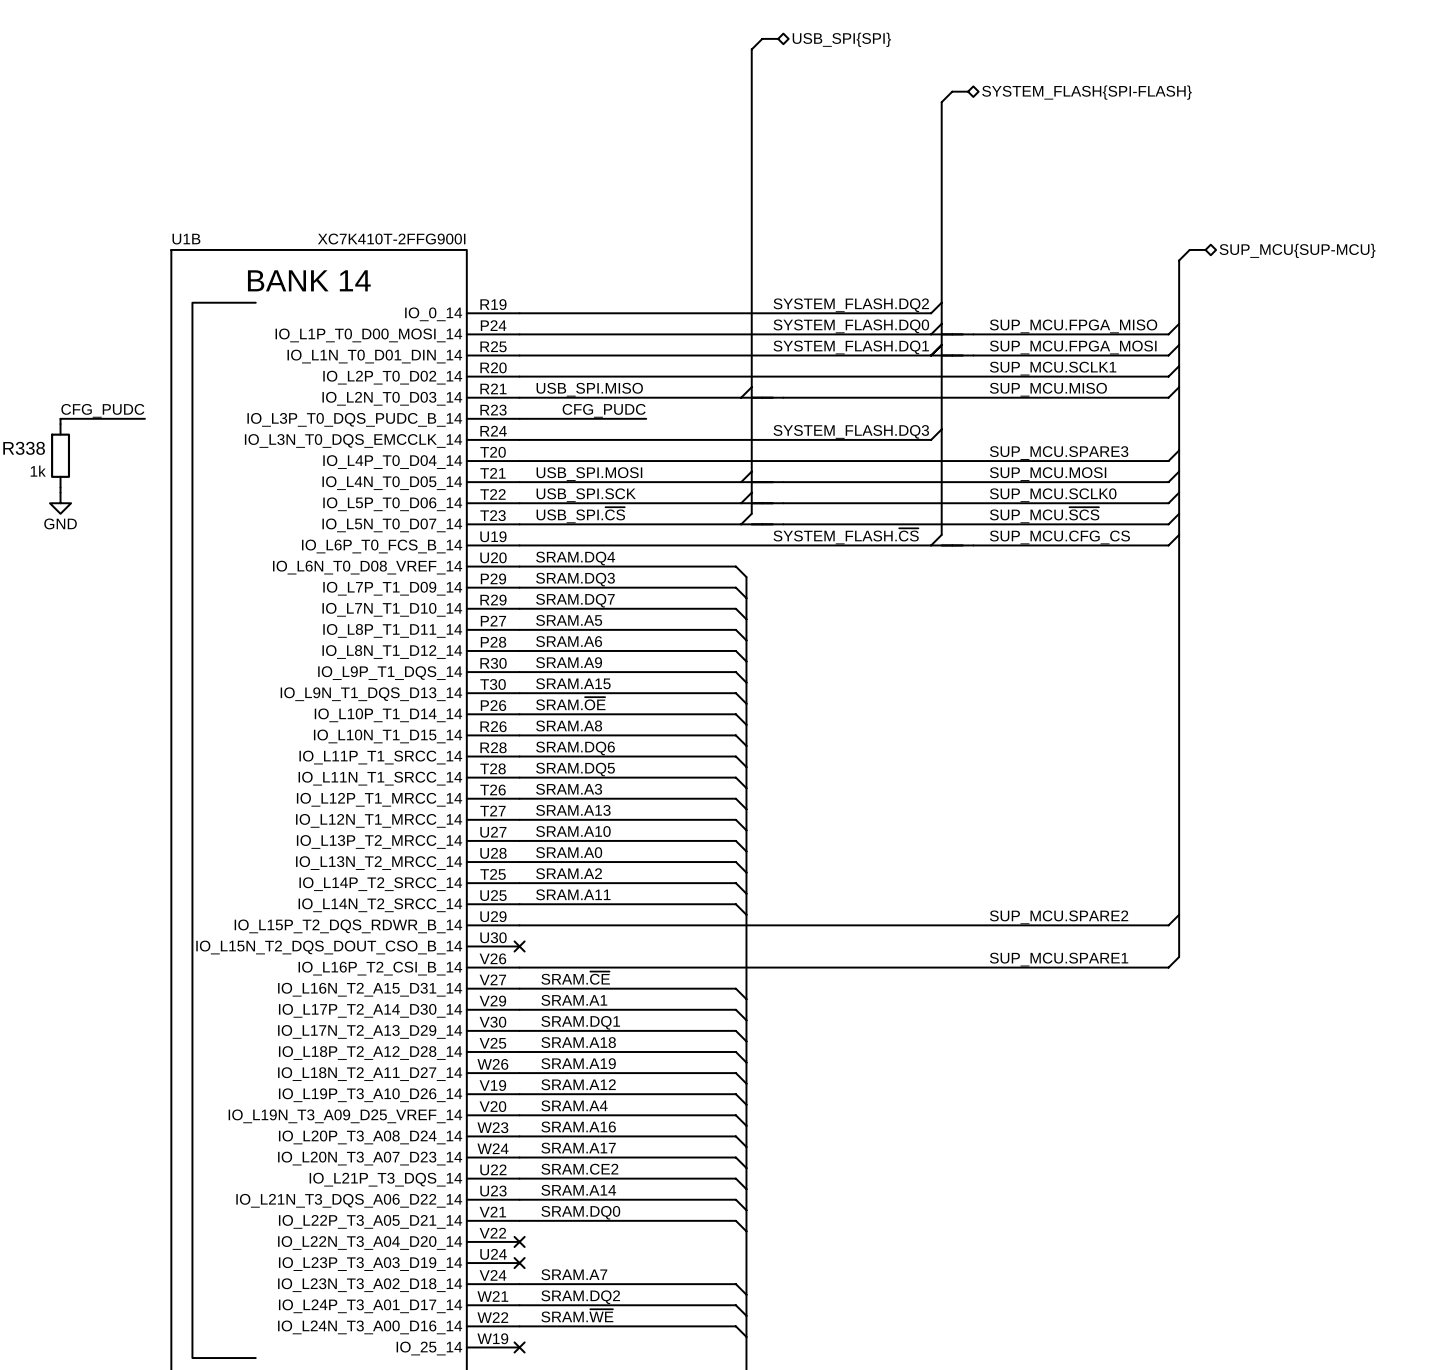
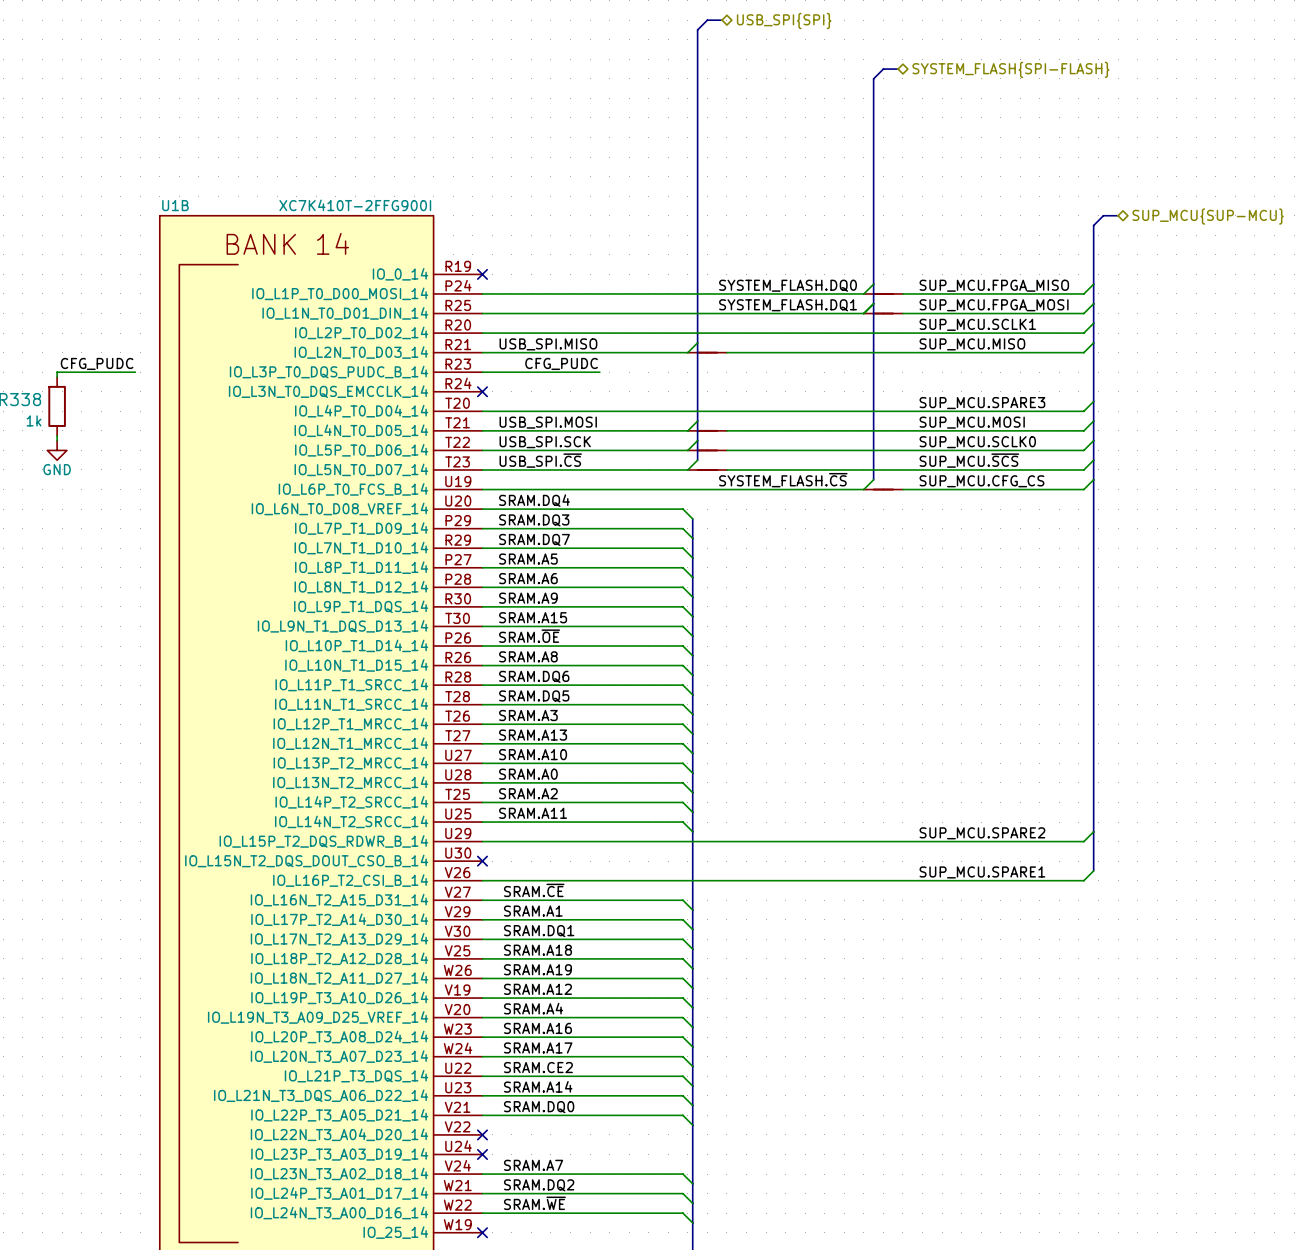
wire: (941, 302) (931, 313) (519, 313) -> none
label: SYSTEM_FLASH.DQ2 (851, 305) -> none
no-connect mark: none -> (482, 274)
wire: (941, 429) (931, 439) (519, 439) -> none
label: SYSTEM_FLASH.DQ3 (851, 431) -> none
no-connect mark: none -> (482, 391)

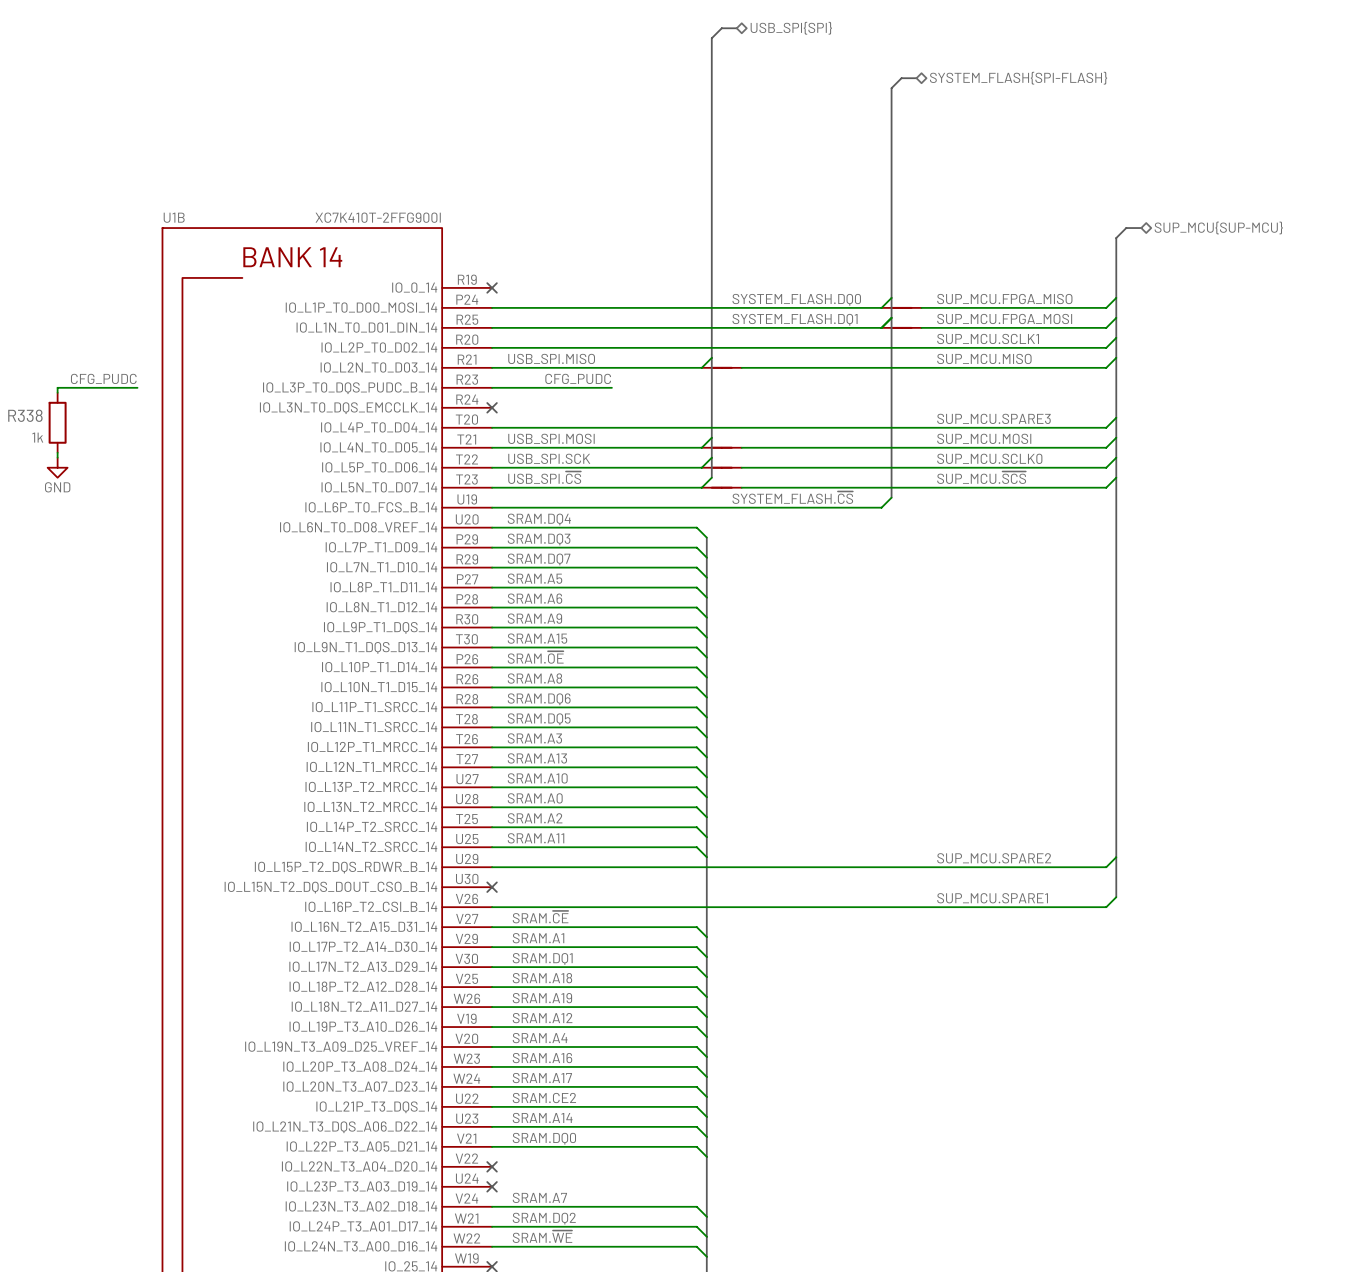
wire: (1093, 479) (1083, 489) -> none
label: SUP_MCU.CFG_CS (981, 481) -> none
part: (883, 489) -> none
wire: (902, 489) (1083, 489) -> none

